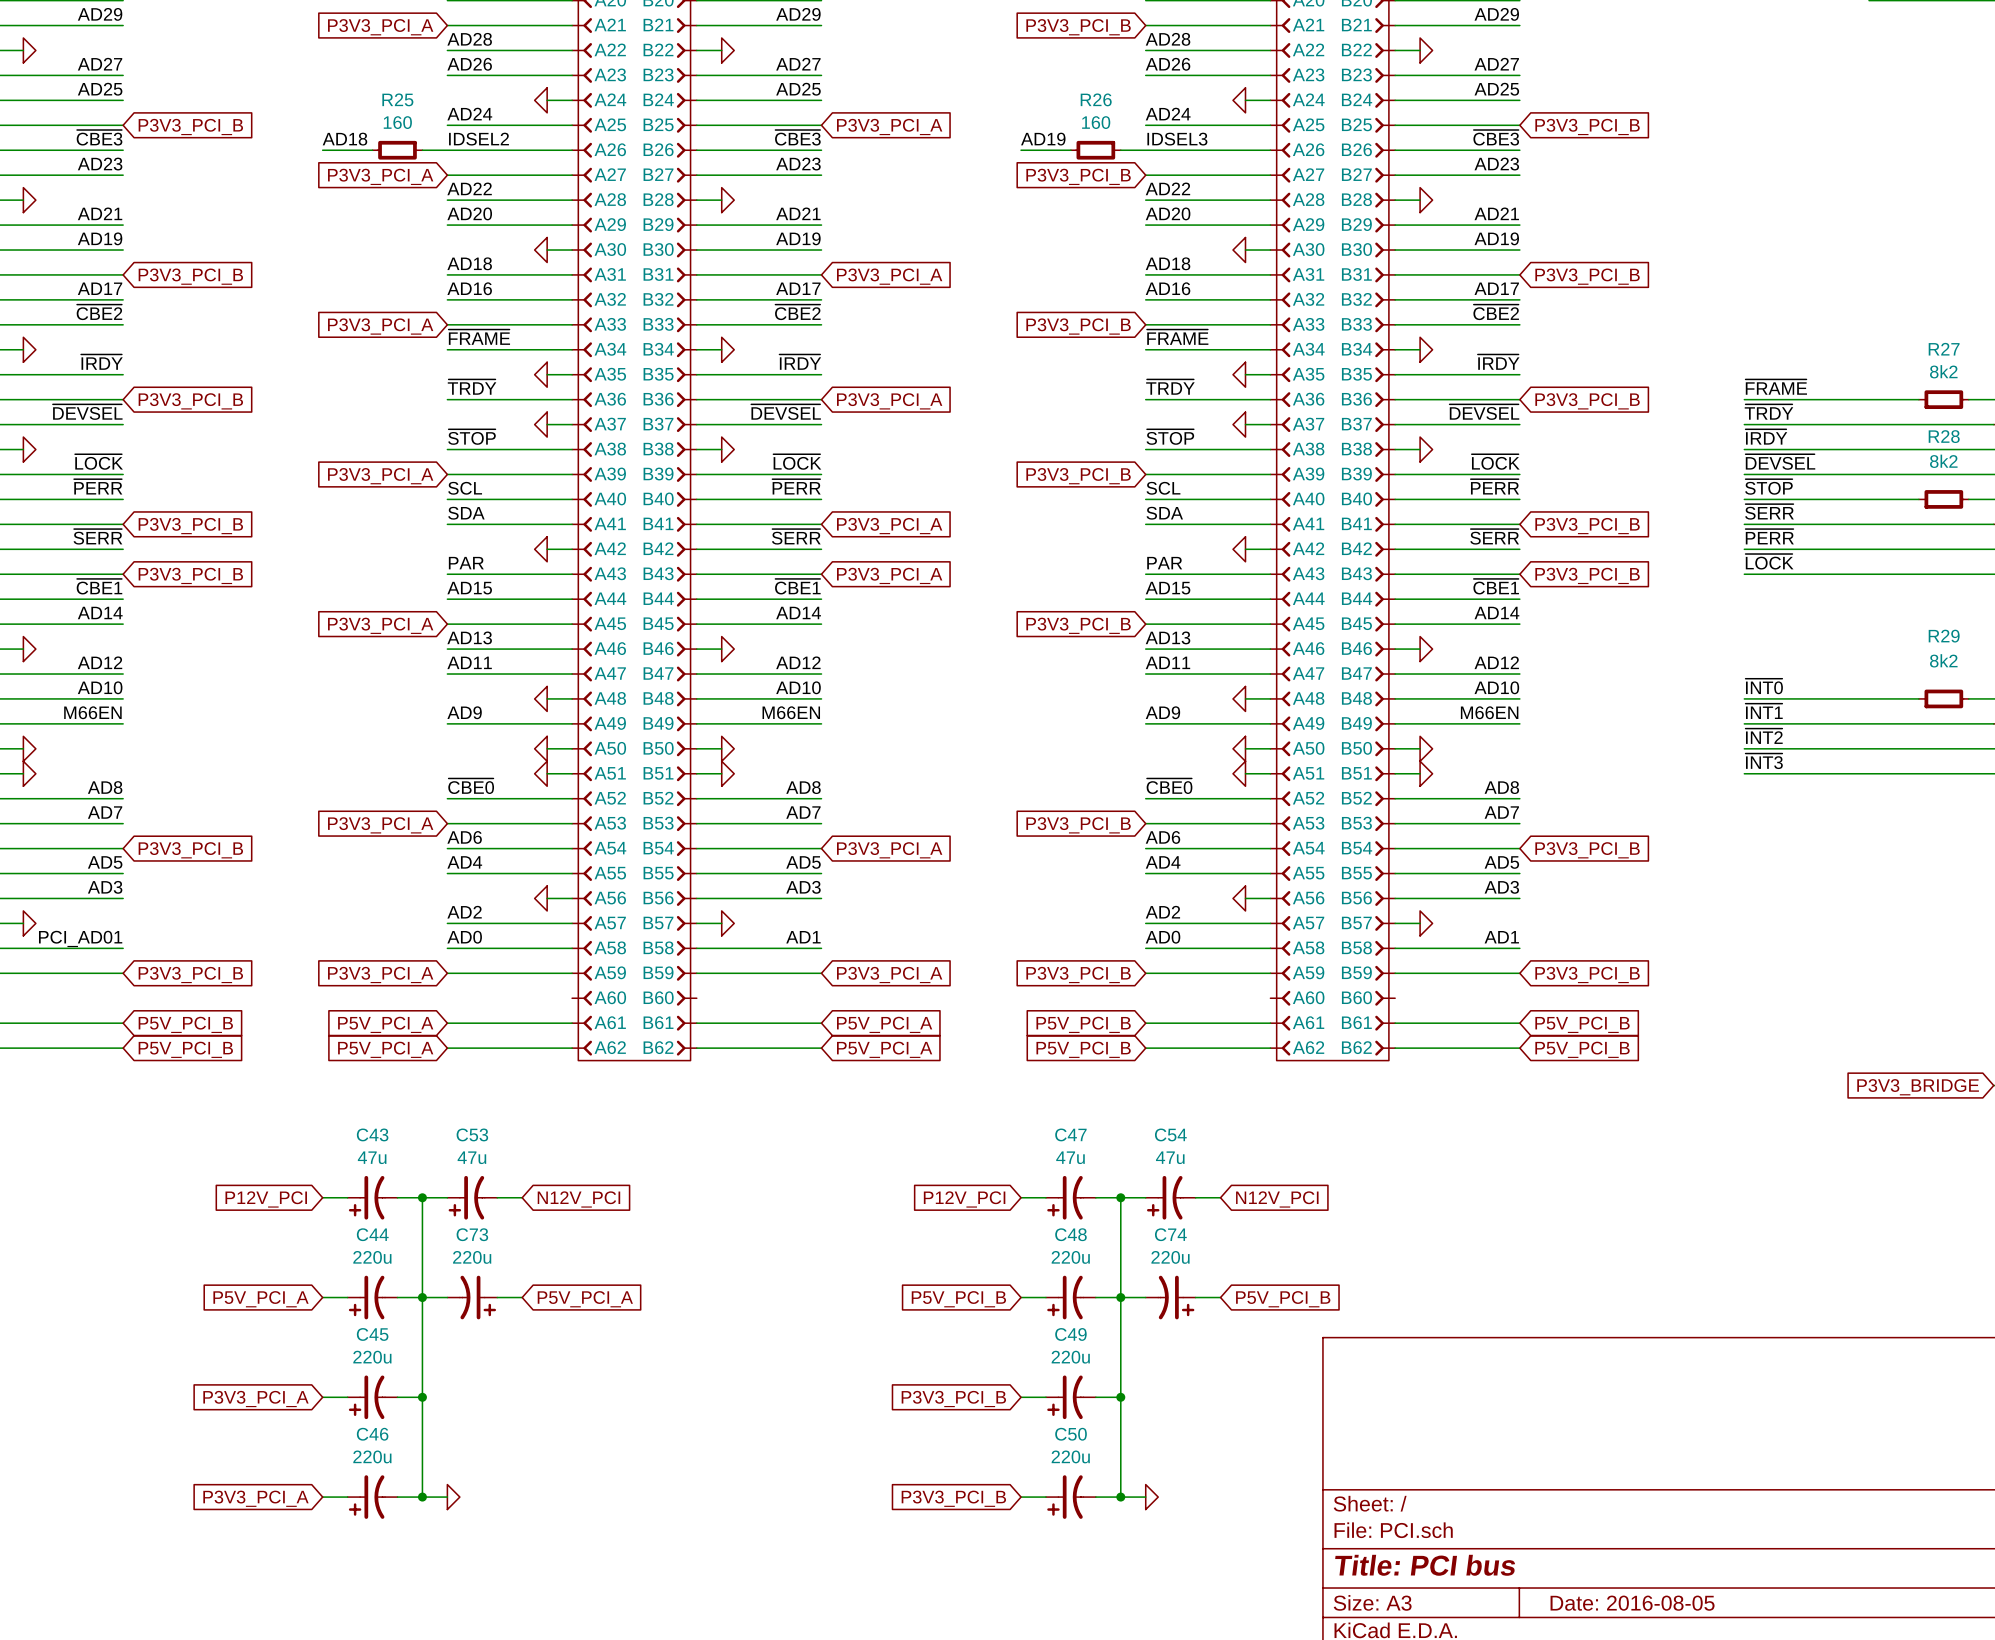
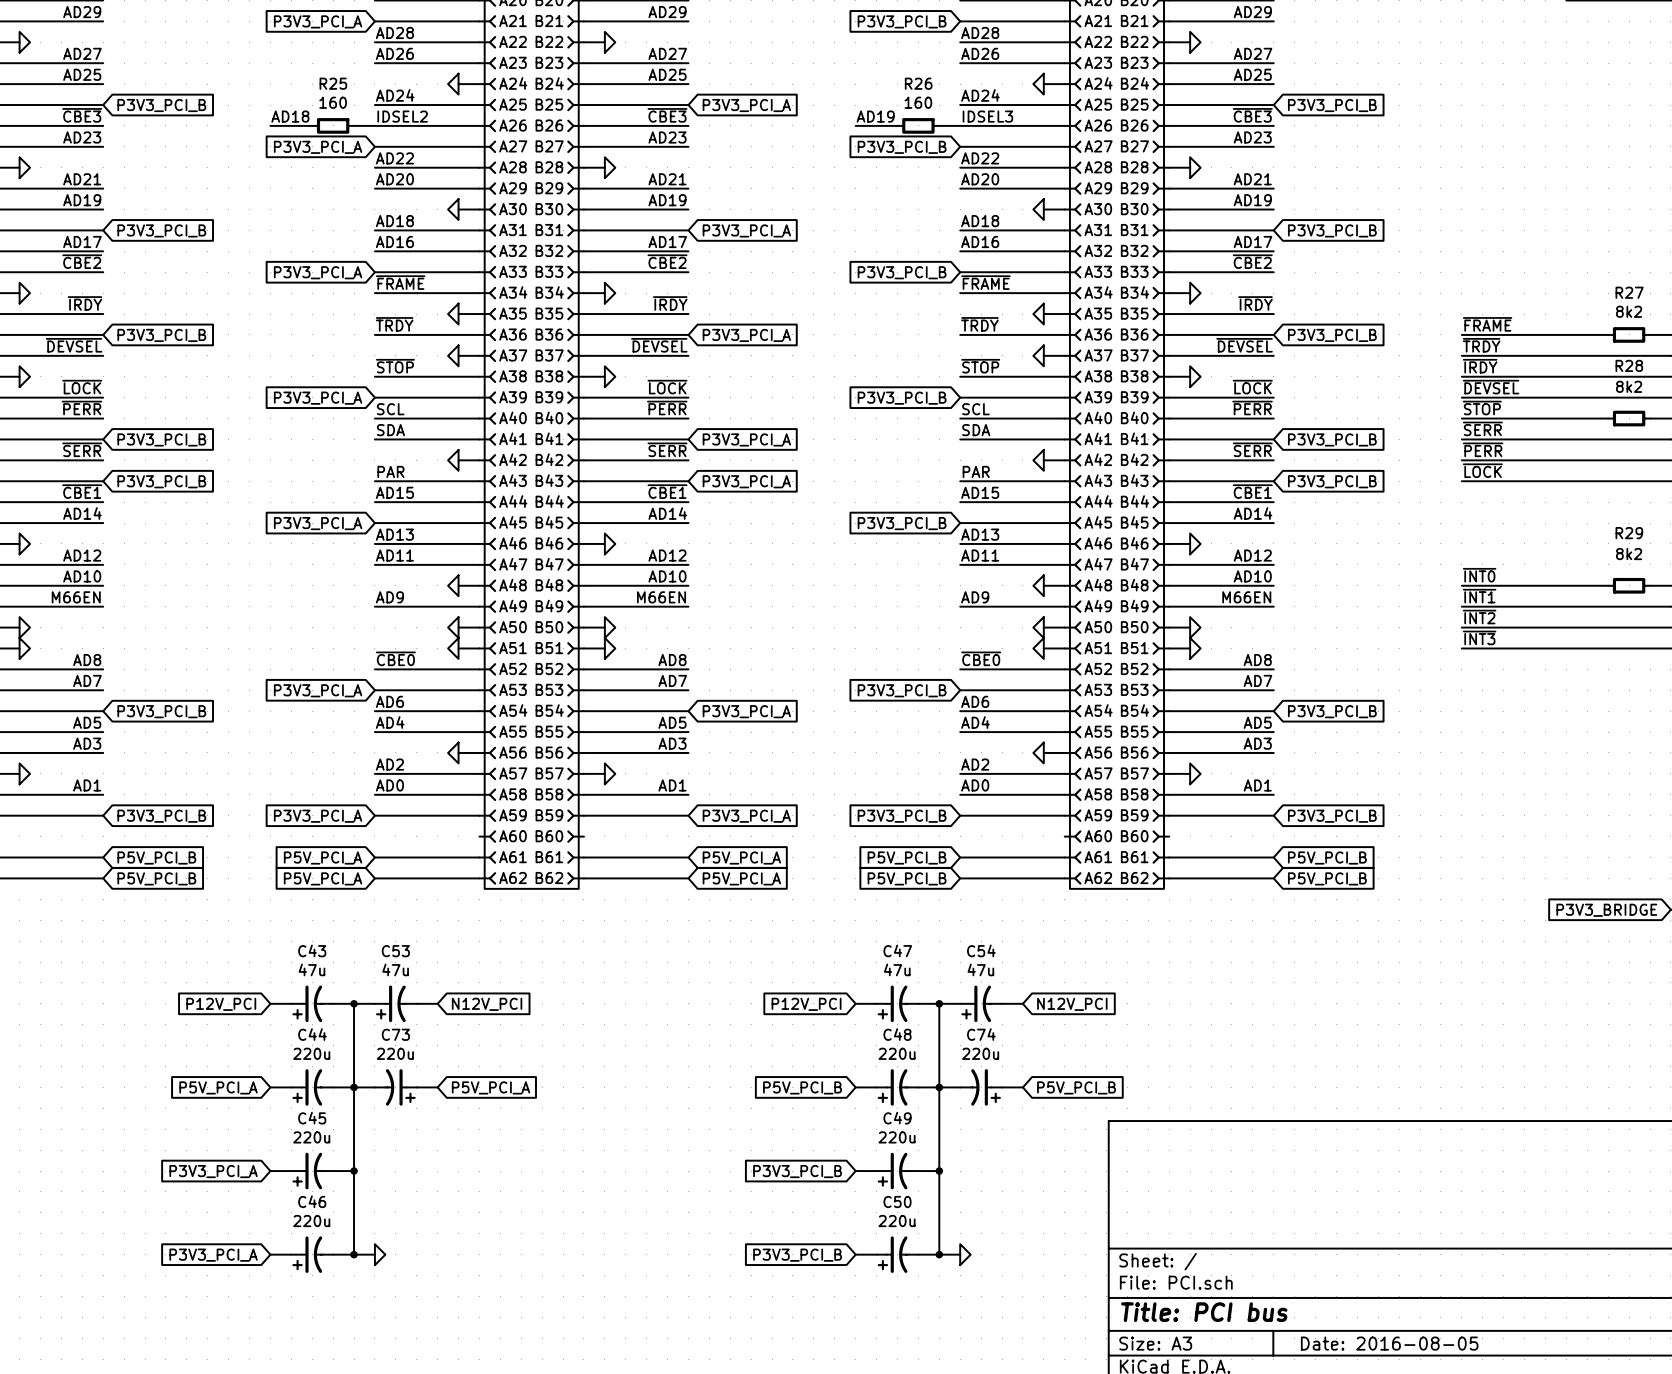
label: PCI_AD01 (80, 938) -> AD1 (87, 785)

